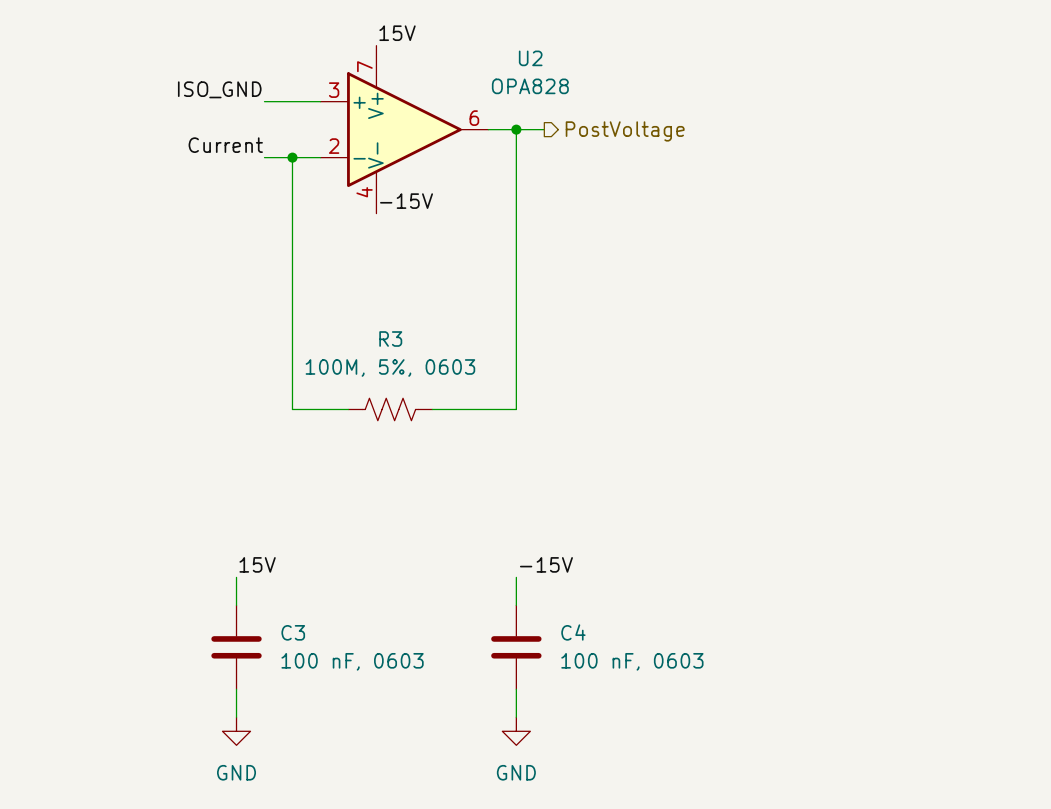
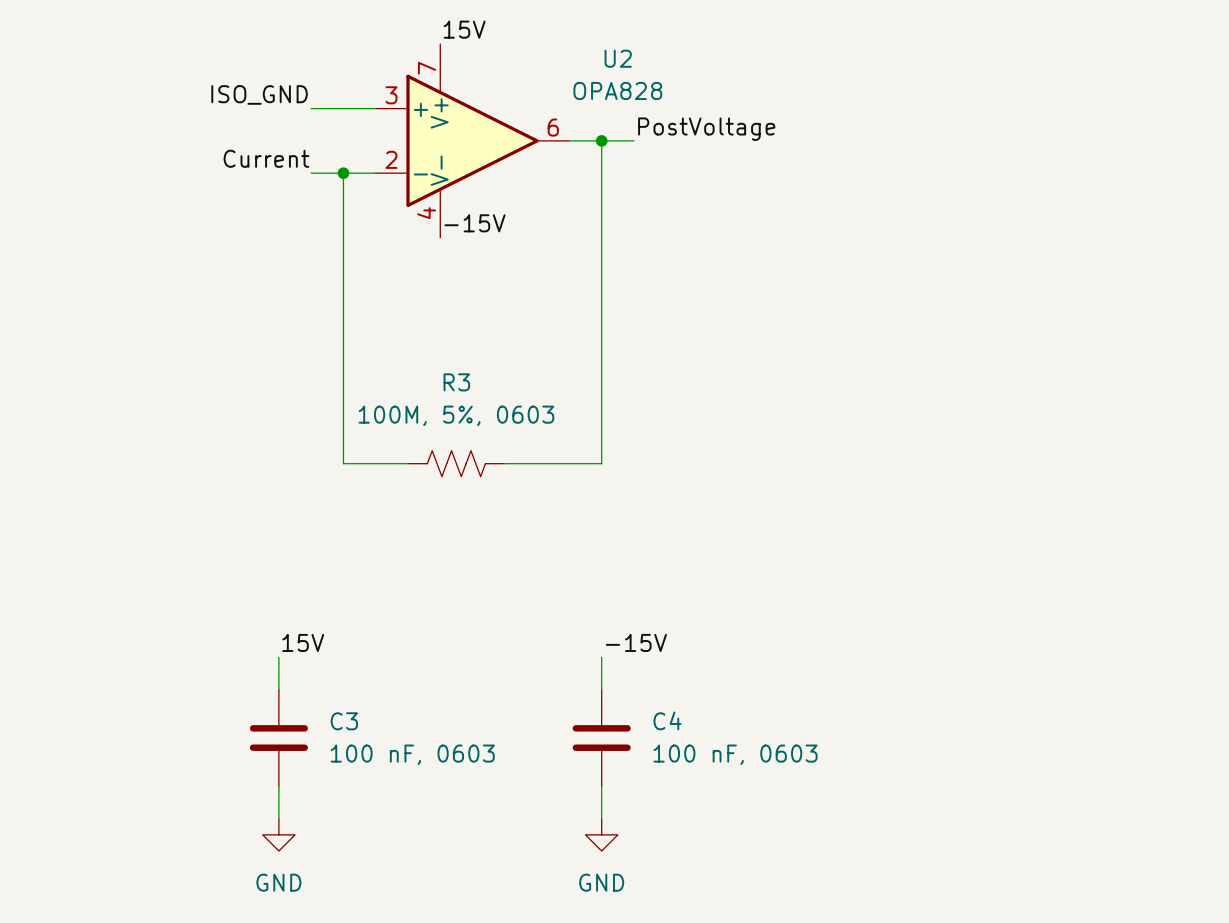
label: none -> PostVoltage (706, 129)
hierarchical label: PostVoltage (625, 131) -> none

